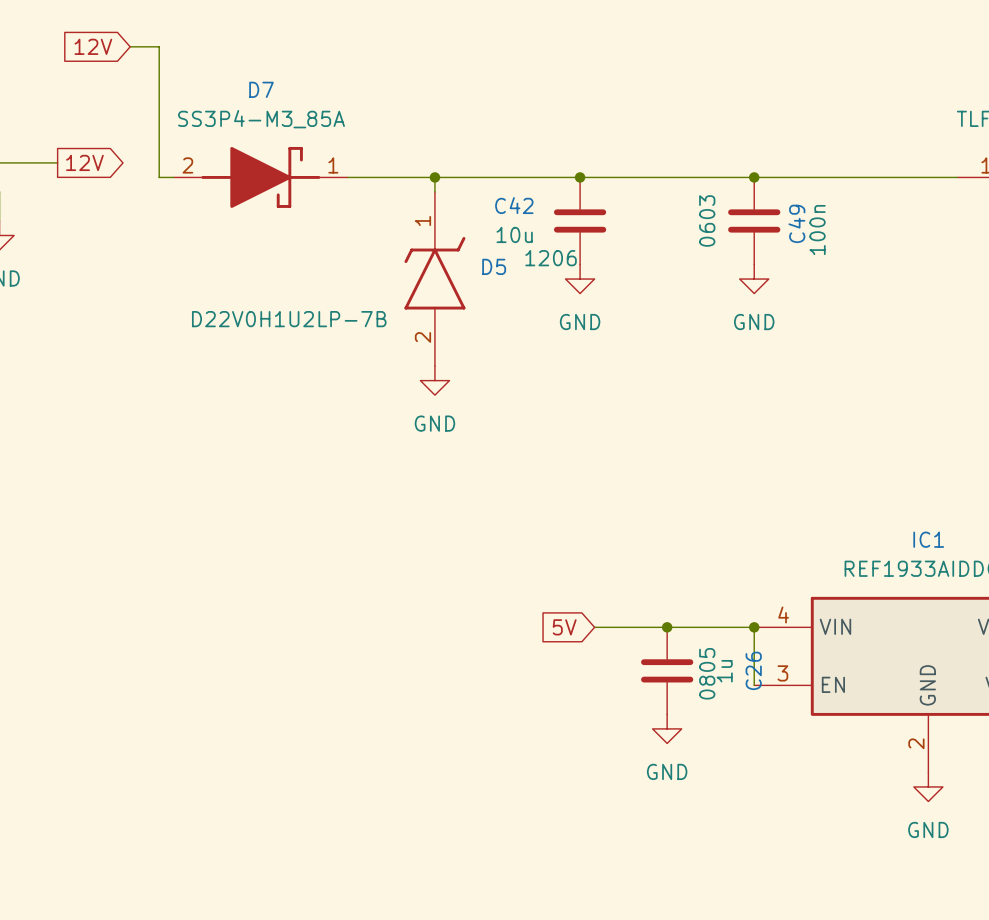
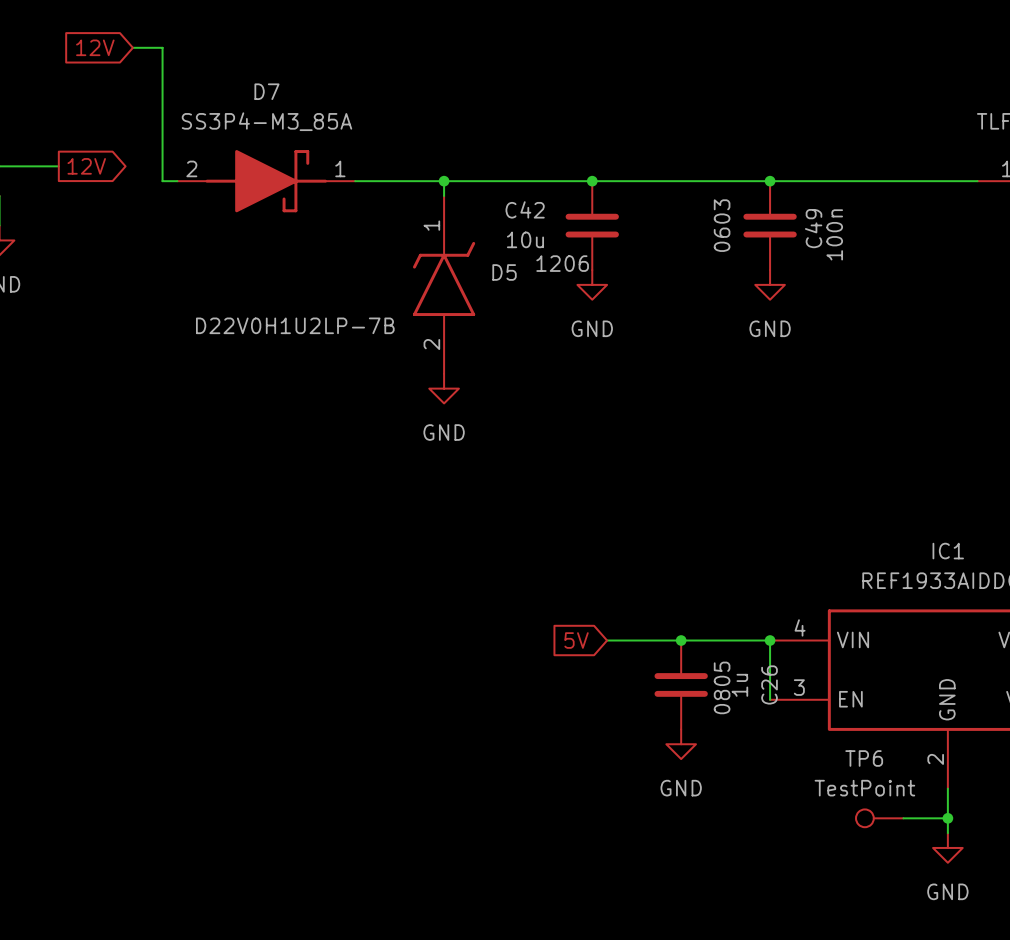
wire: none -> (947, 788) (947, 833)
power symbol position: GND (928, 786) -> GND (947, 847)
TP6: none -> TestPoint (879, 818)
wire: none -> (903, 818) (947, 818)
junction: none -> (947, 818)

